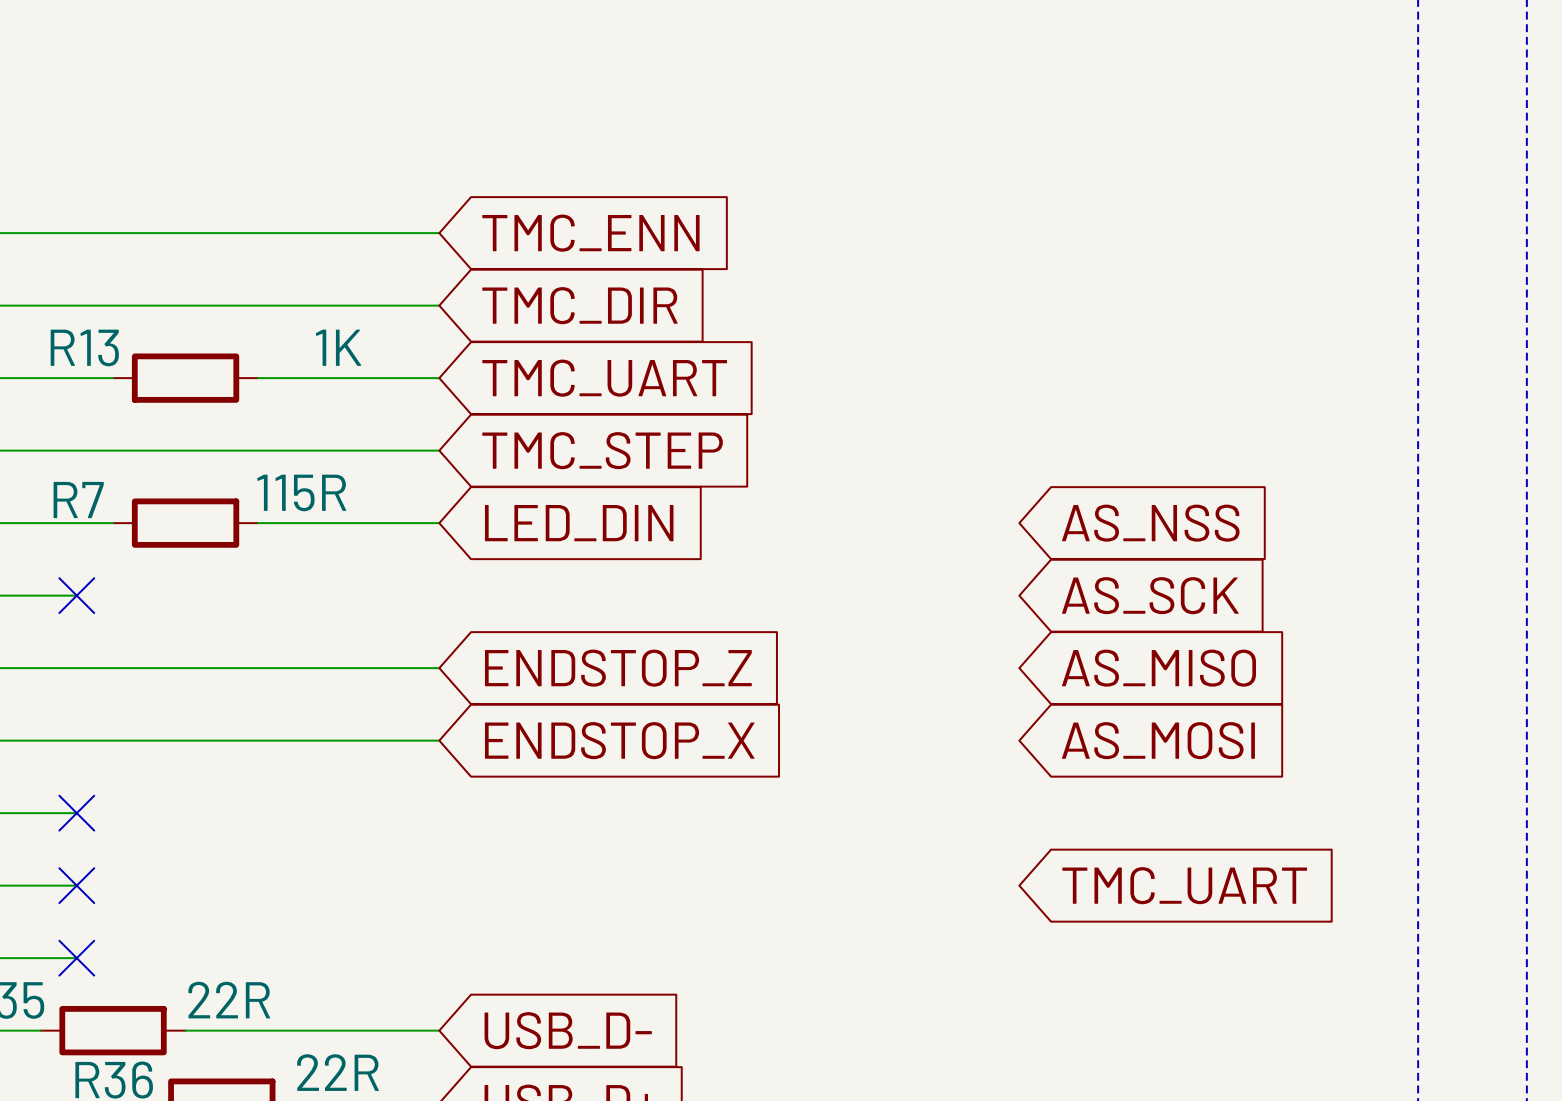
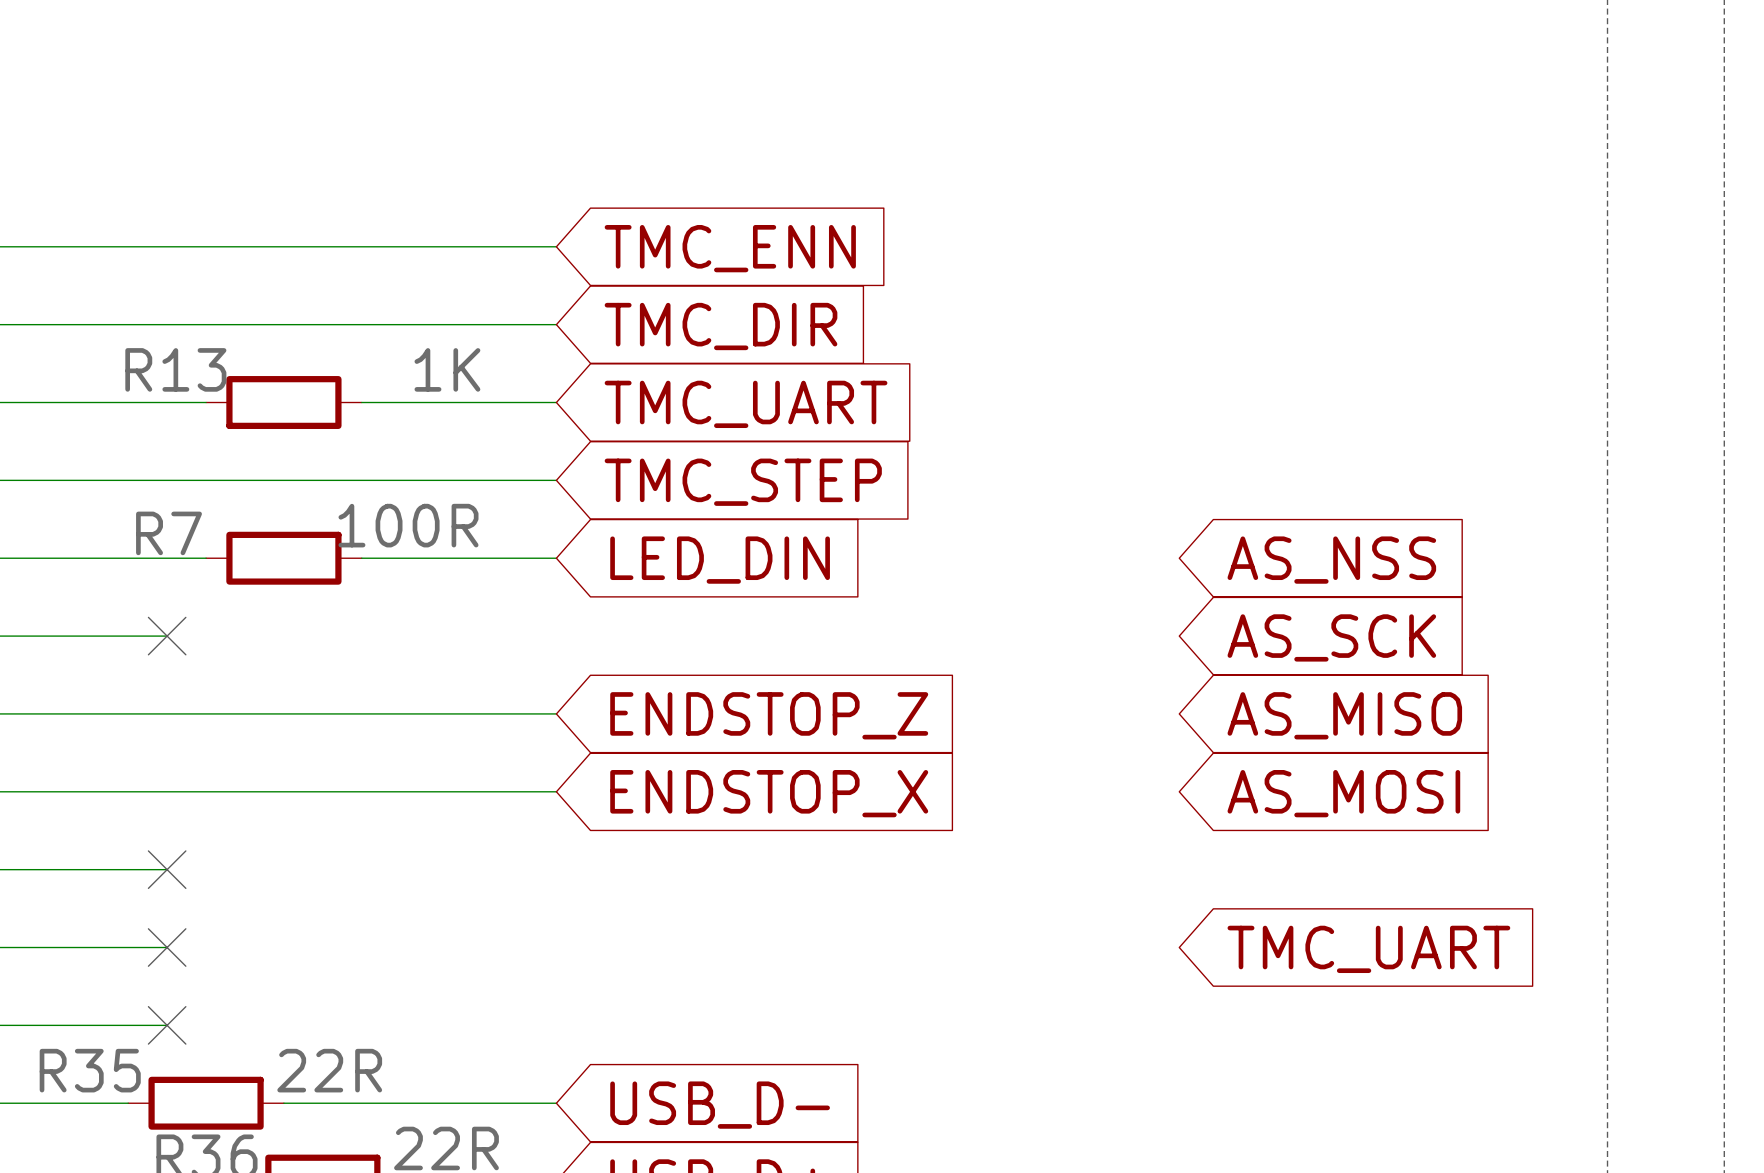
R7 value: 115R (301, 492) -> 100R (408, 525)

